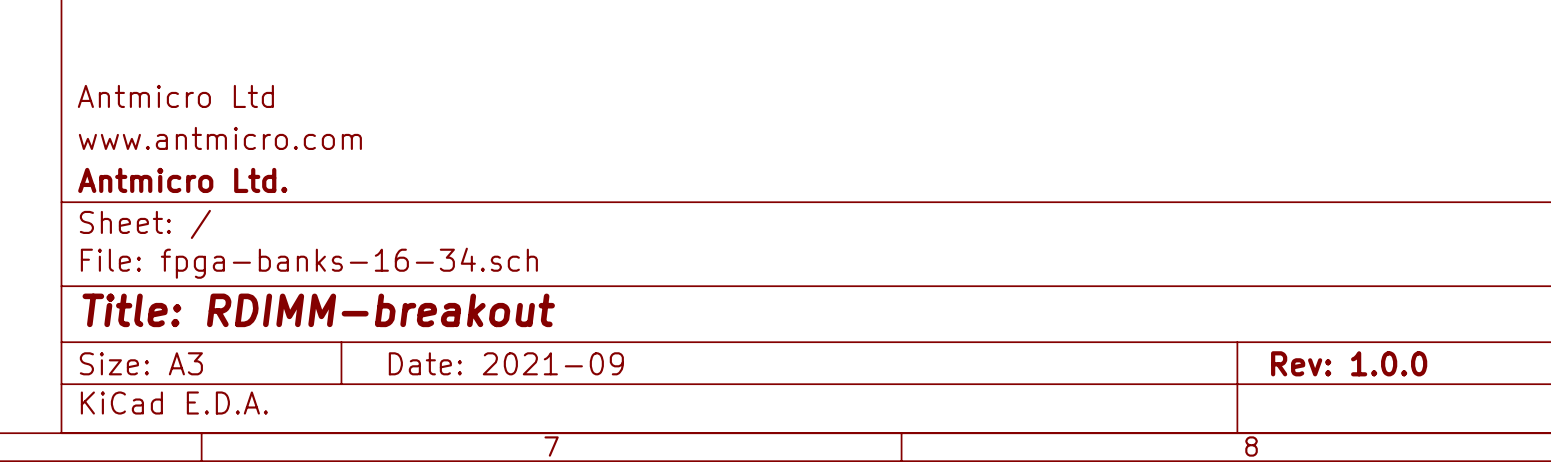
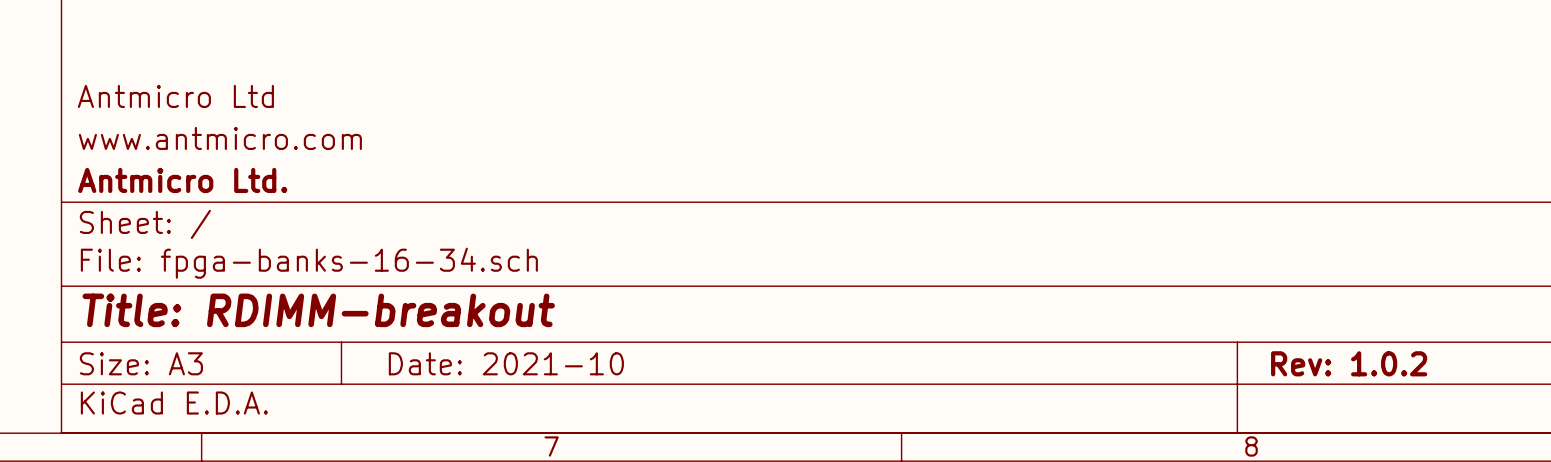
title block: Date: 2021-09 (506, 363) -> Date: 2021-10 (506, 363)
title block: Rev: 1.0.0 (1349, 363) -> Rev: 1.0.2 (1349, 363)

